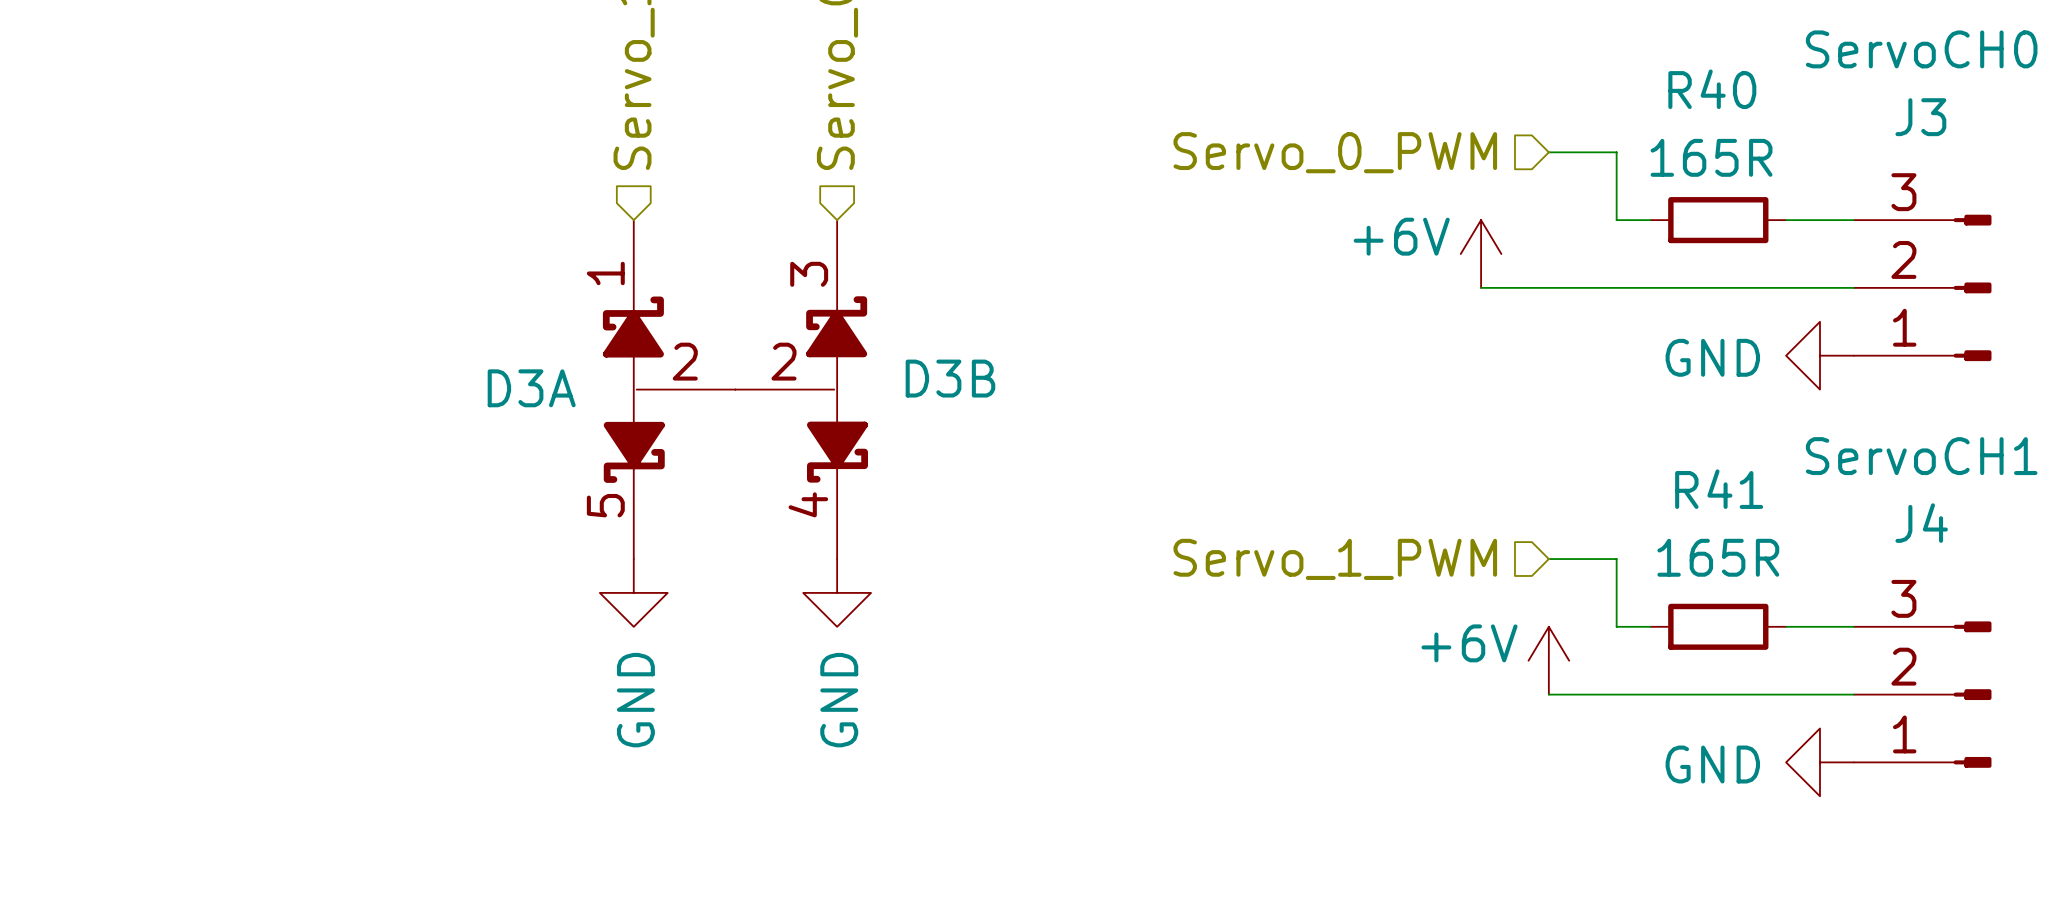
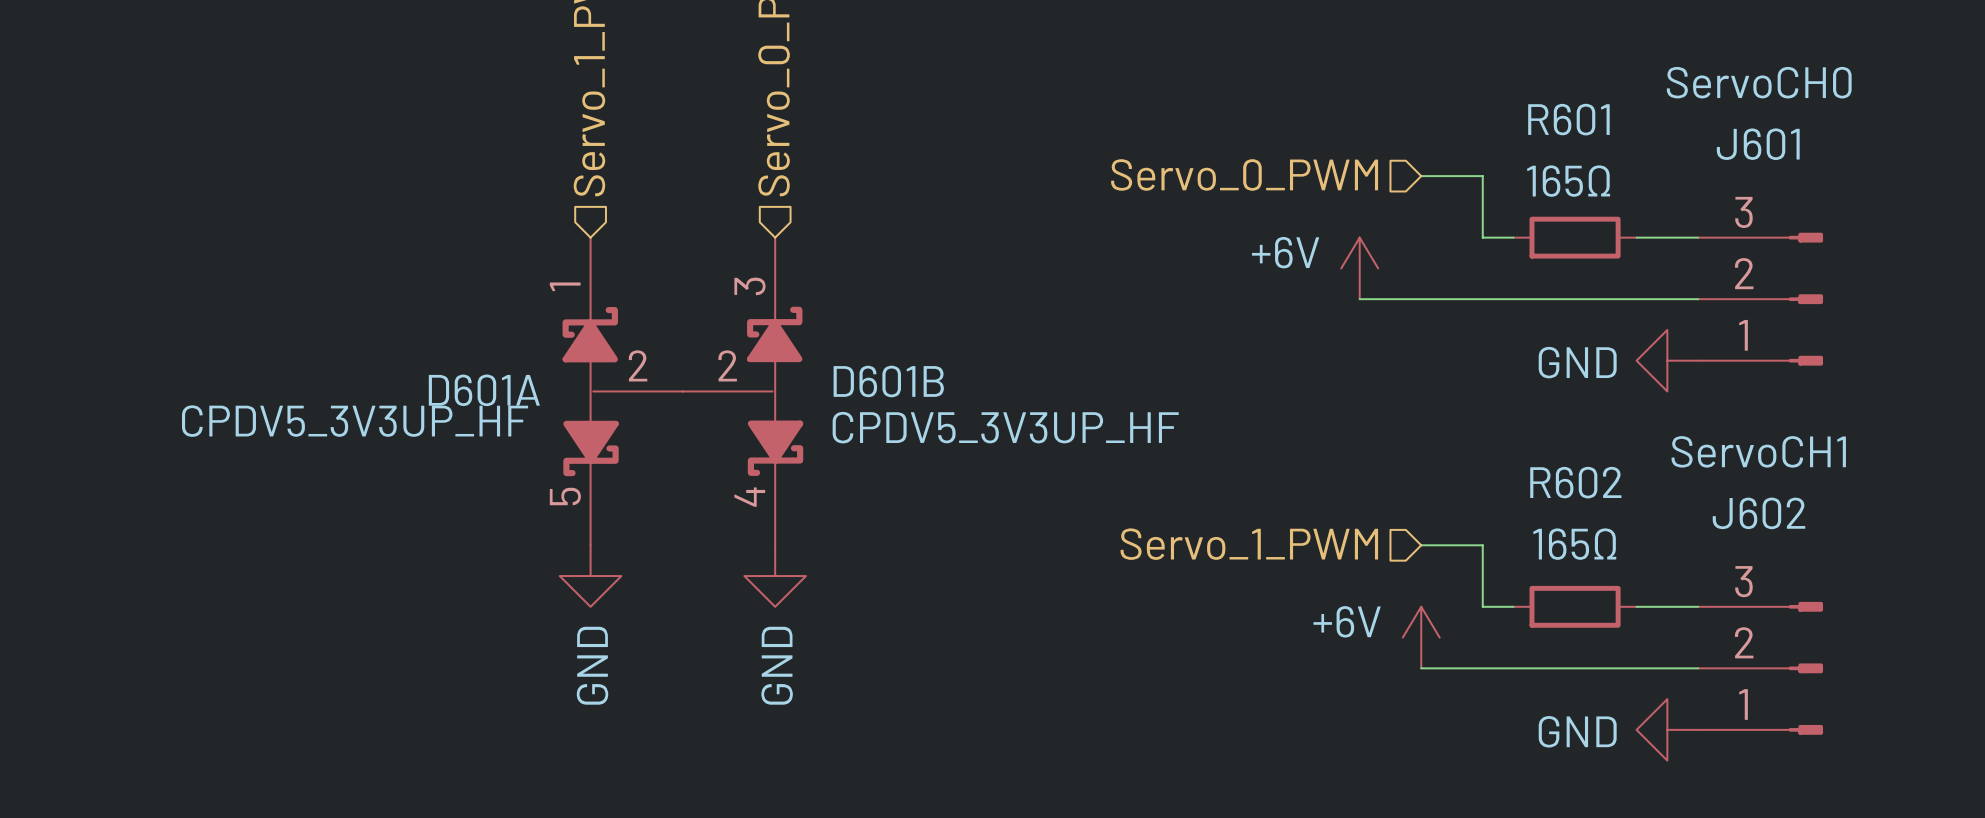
R40 name: R40 (1712, 89) -> R601 (1568, 119)
J3 name: J3 (1920, 117) -> J601 (1758, 144)
R40 value: 165R (1711, 157) -> 165Ω (1568, 181)
D3B name: D3B (950, 378) -> D601B (888, 381)
D3A name: D3A (531, 388) -> D601A (484, 390)
D3A value: none -> CPDV5_3V3UP_HF (355, 421)
D3B value: none -> CPDV5_3V3UP_HF (1005, 427)
R41 name: R41 (1719, 489) -> R602 (1575, 482)
J4 name: J4 (1921, 523) -> J602 (1759, 513)
R41 value: 165R (1718, 557) -> 165Ω (1574, 544)

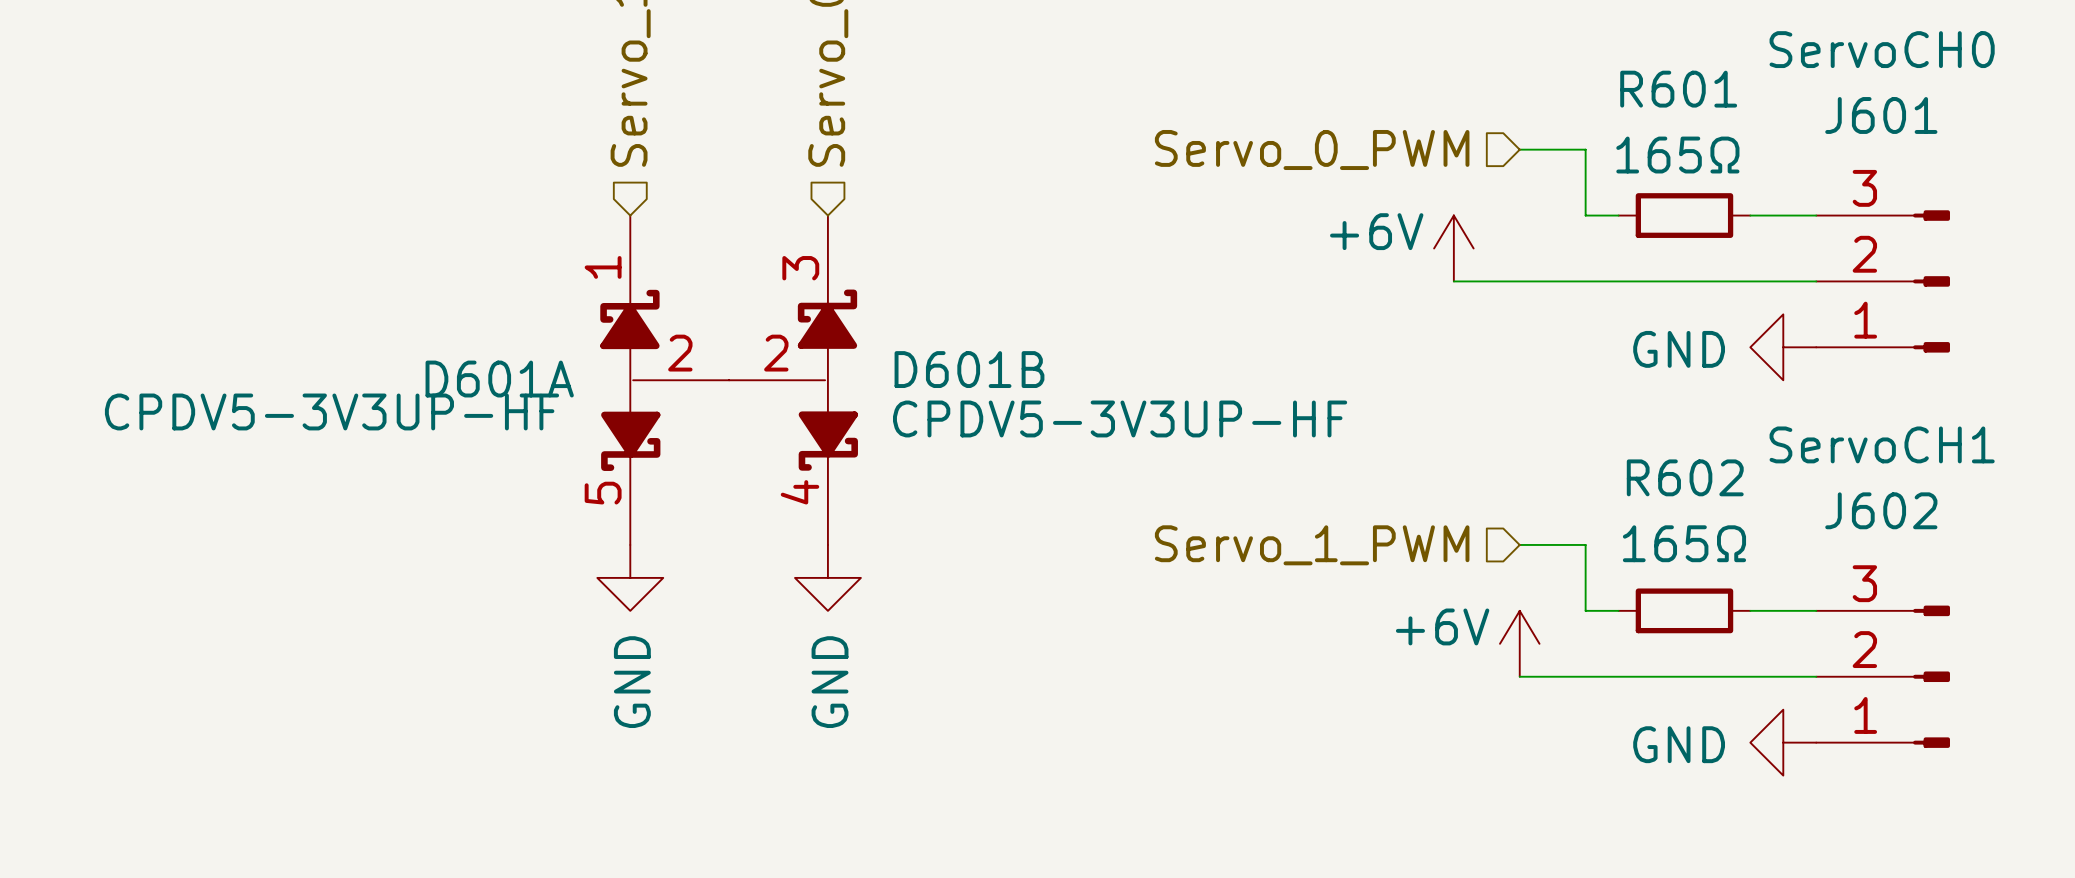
D601A value: CPDV5_3V3UP_HF (355, 421) -> CPDV5-3V3UP-HF (331, 411)
D601B value: CPDV5_3V3UP_HF (1005, 427) -> CPDV5-3V3UP-HF (1120, 418)

